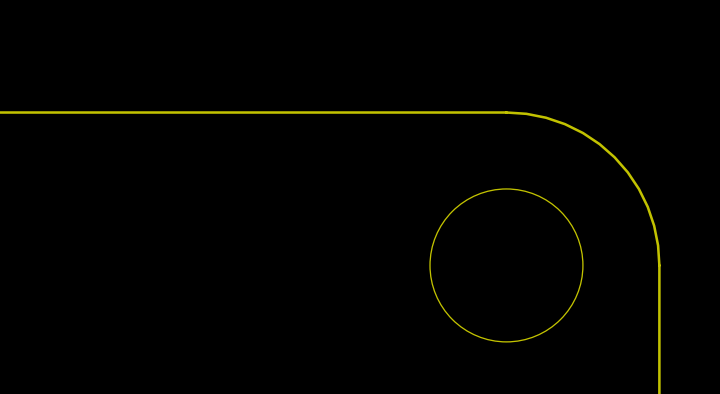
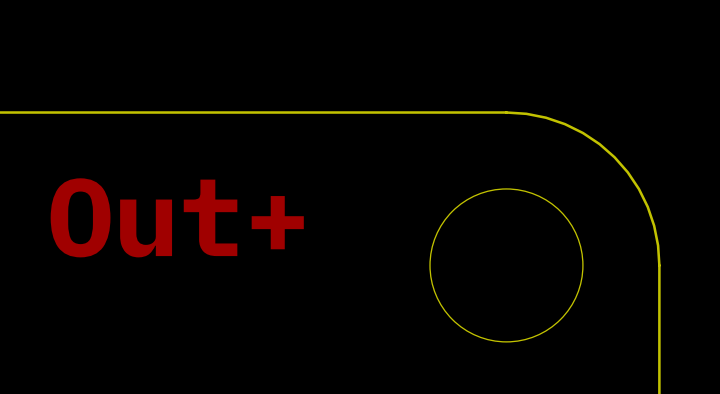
text: none -> Out+ (177, 217)

